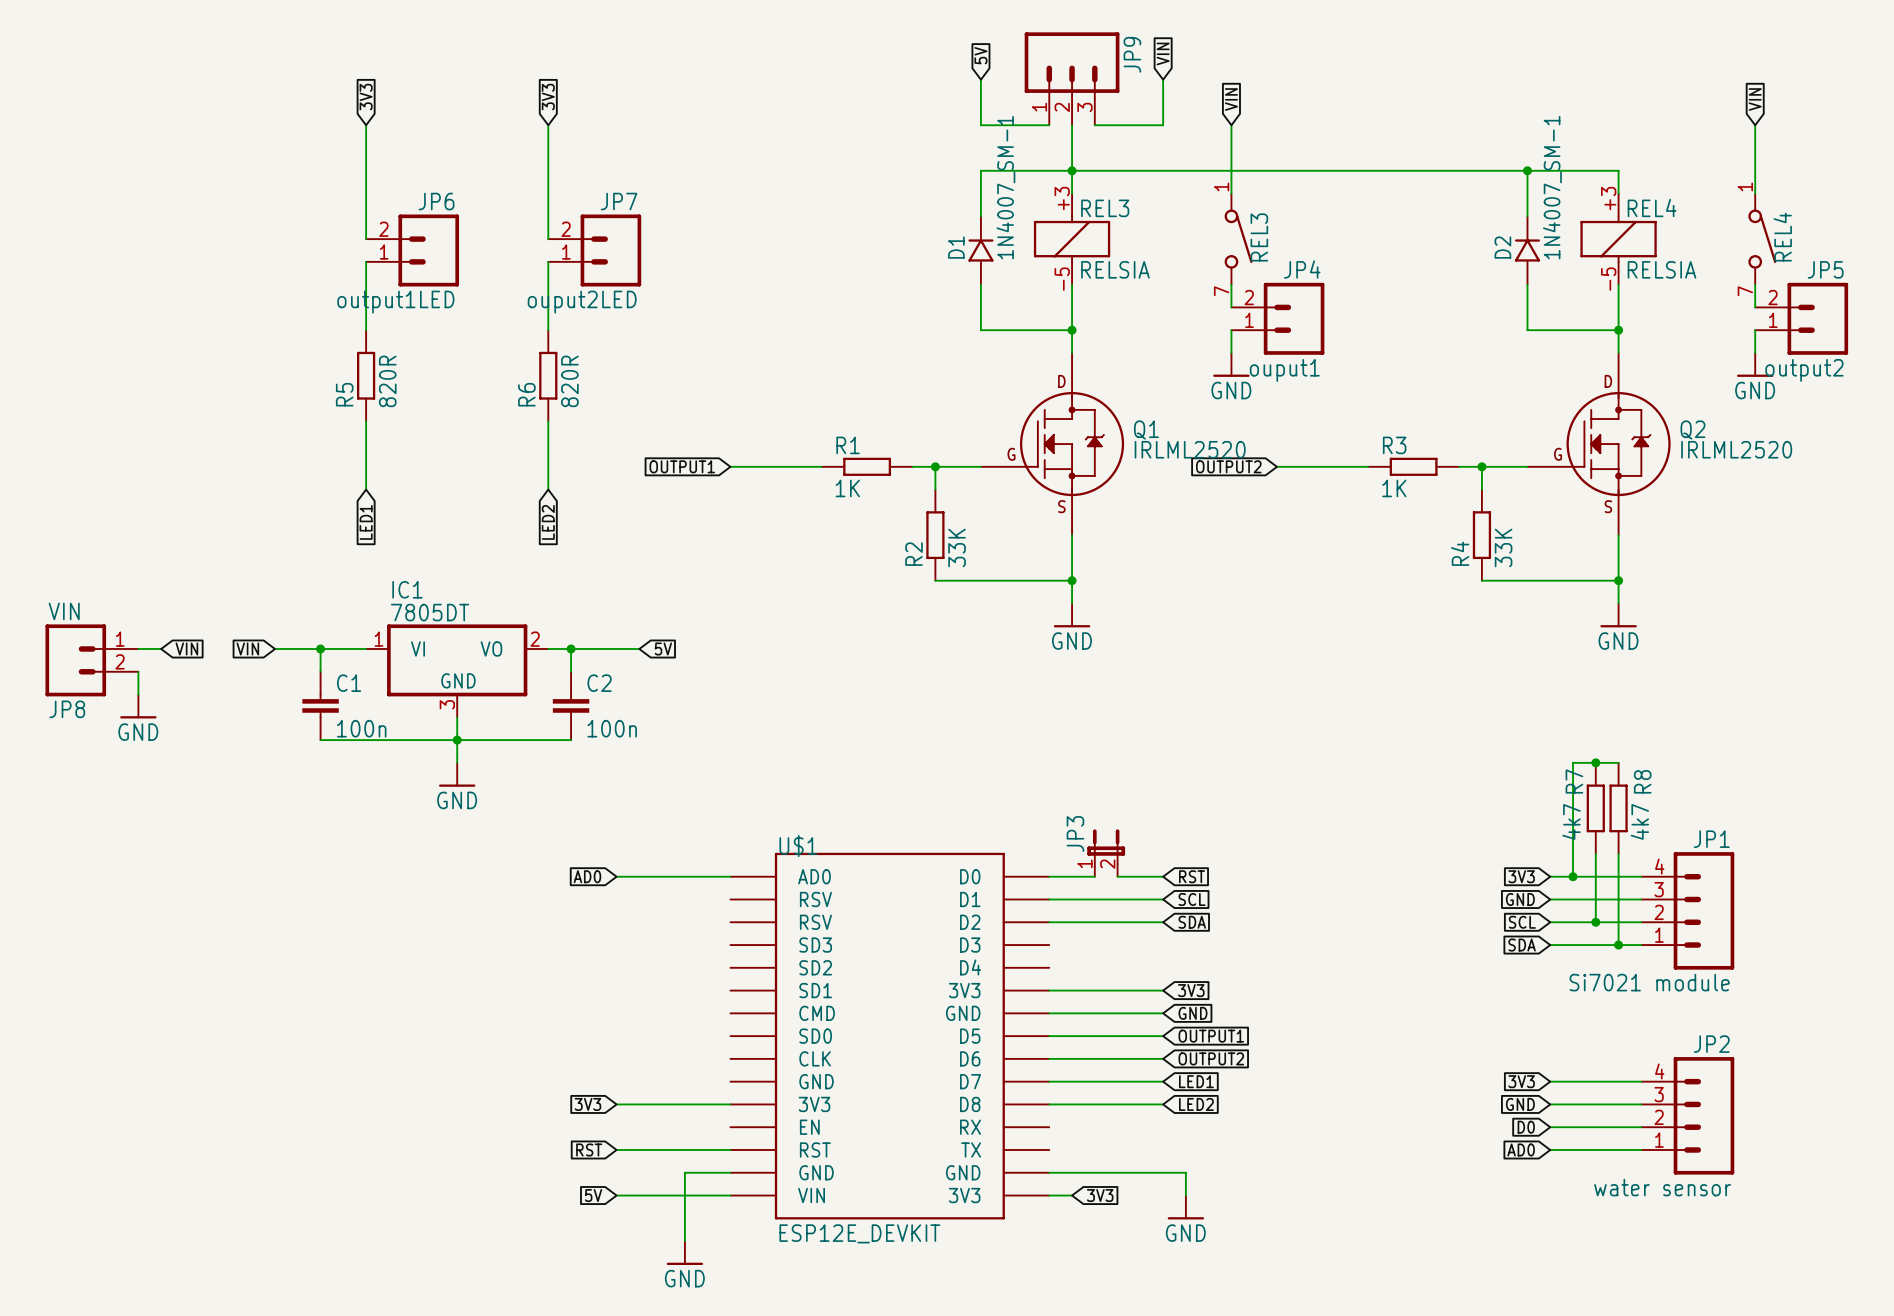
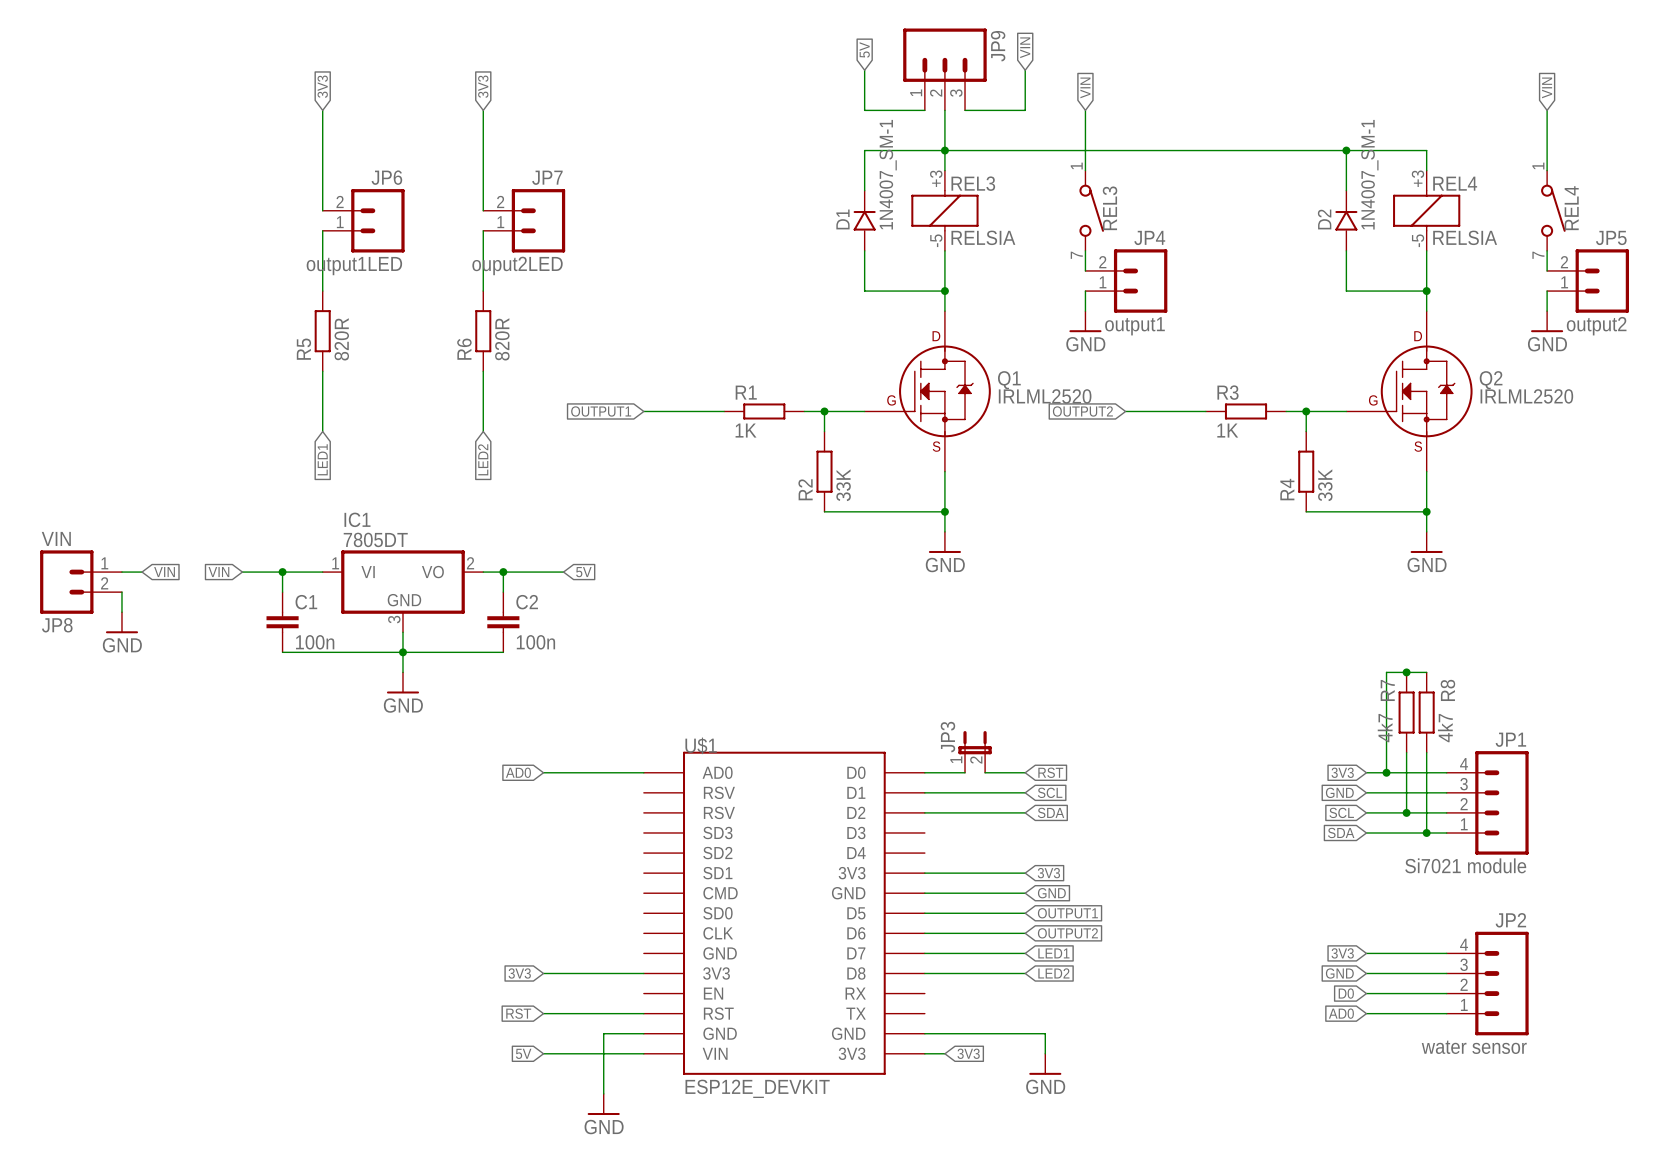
JP4 value: ouput1 (1284, 370) -> output1 (1135, 326)

